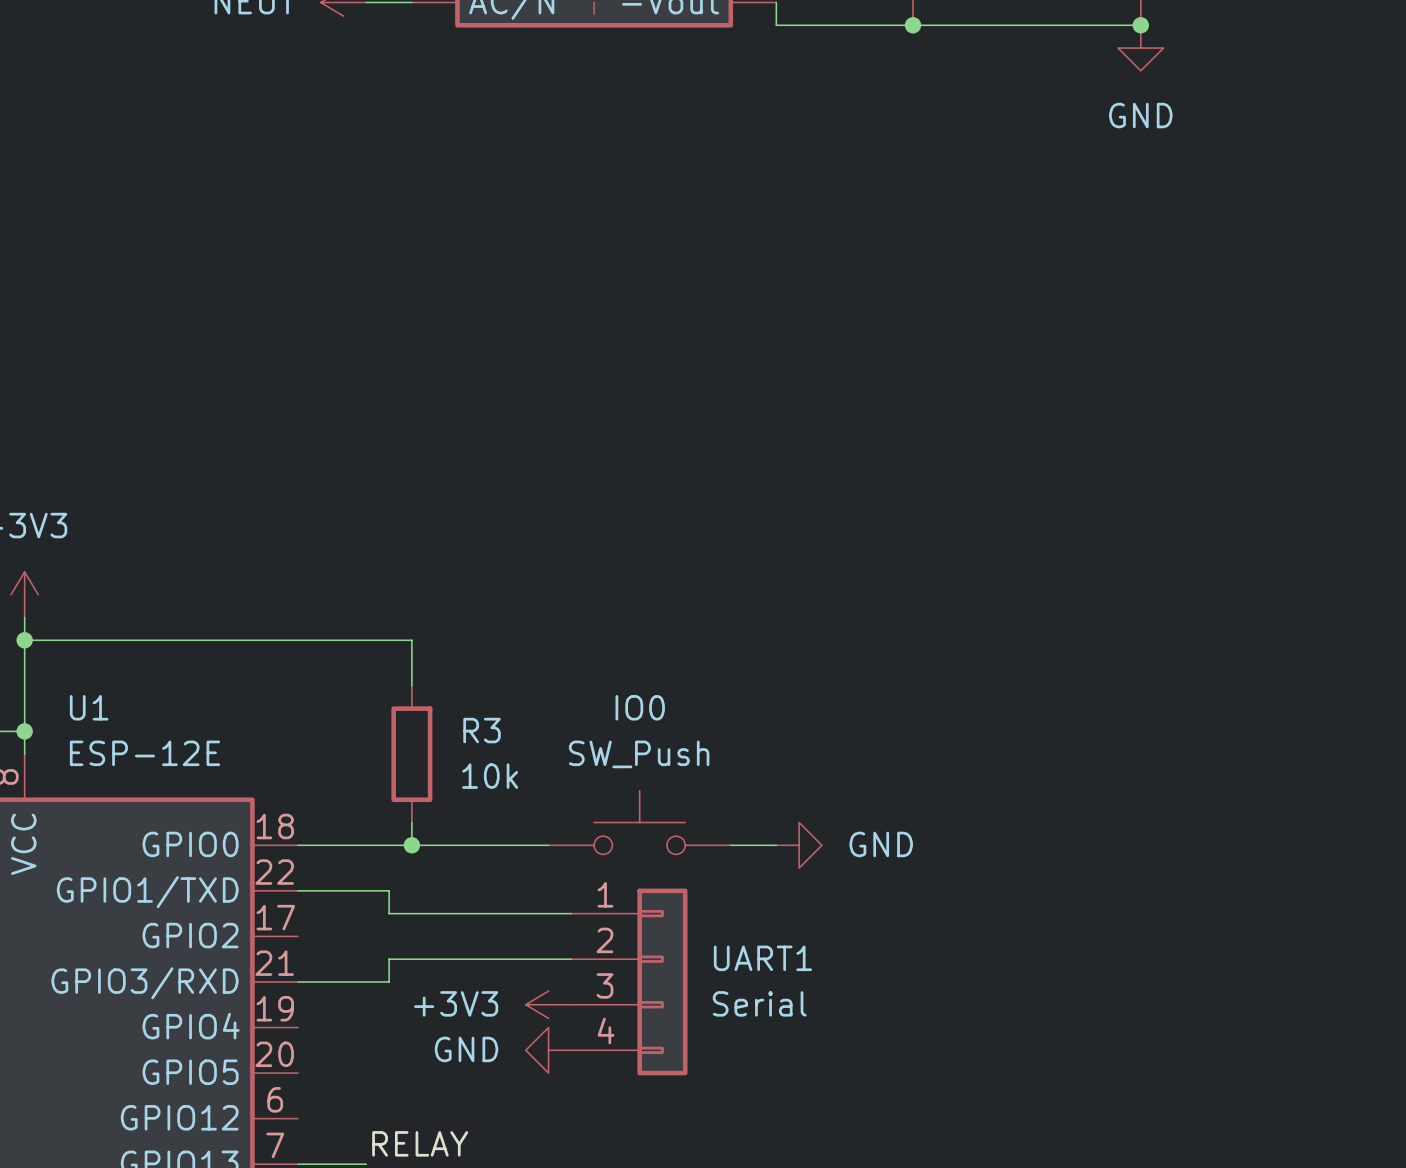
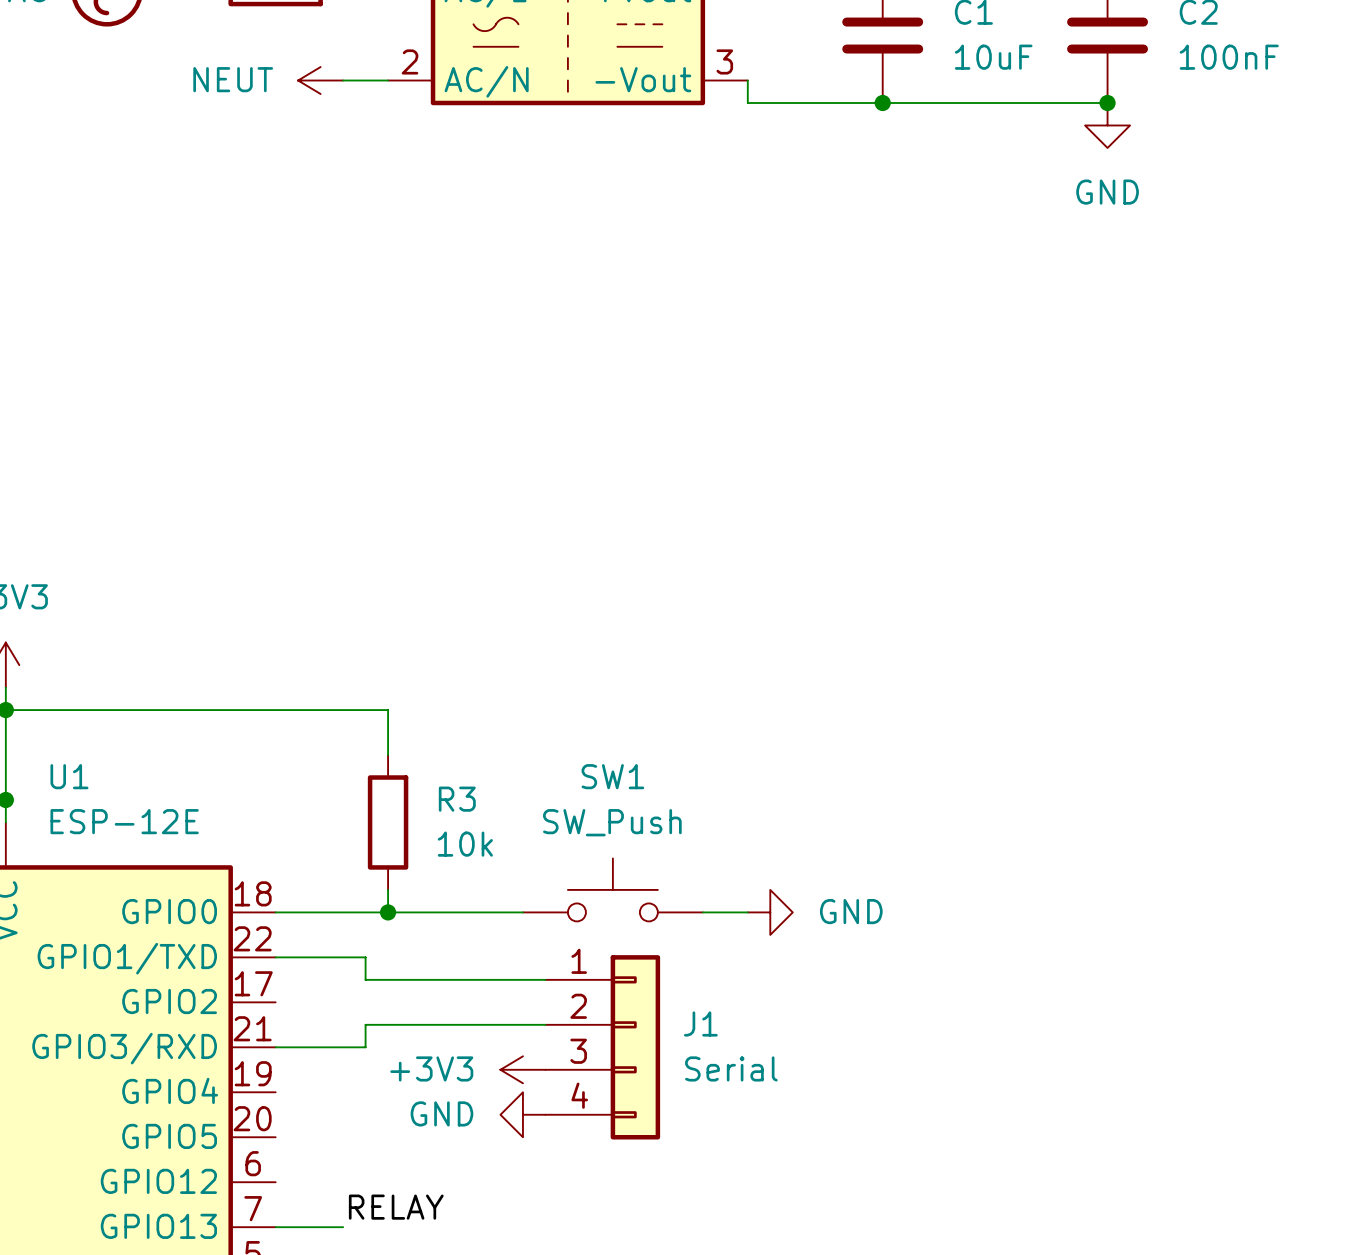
IO0 name: IO0 (640, 707) -> SW1 (612, 776)
UART1 name: UART1 (762, 958) -> J1 (700, 1023)

